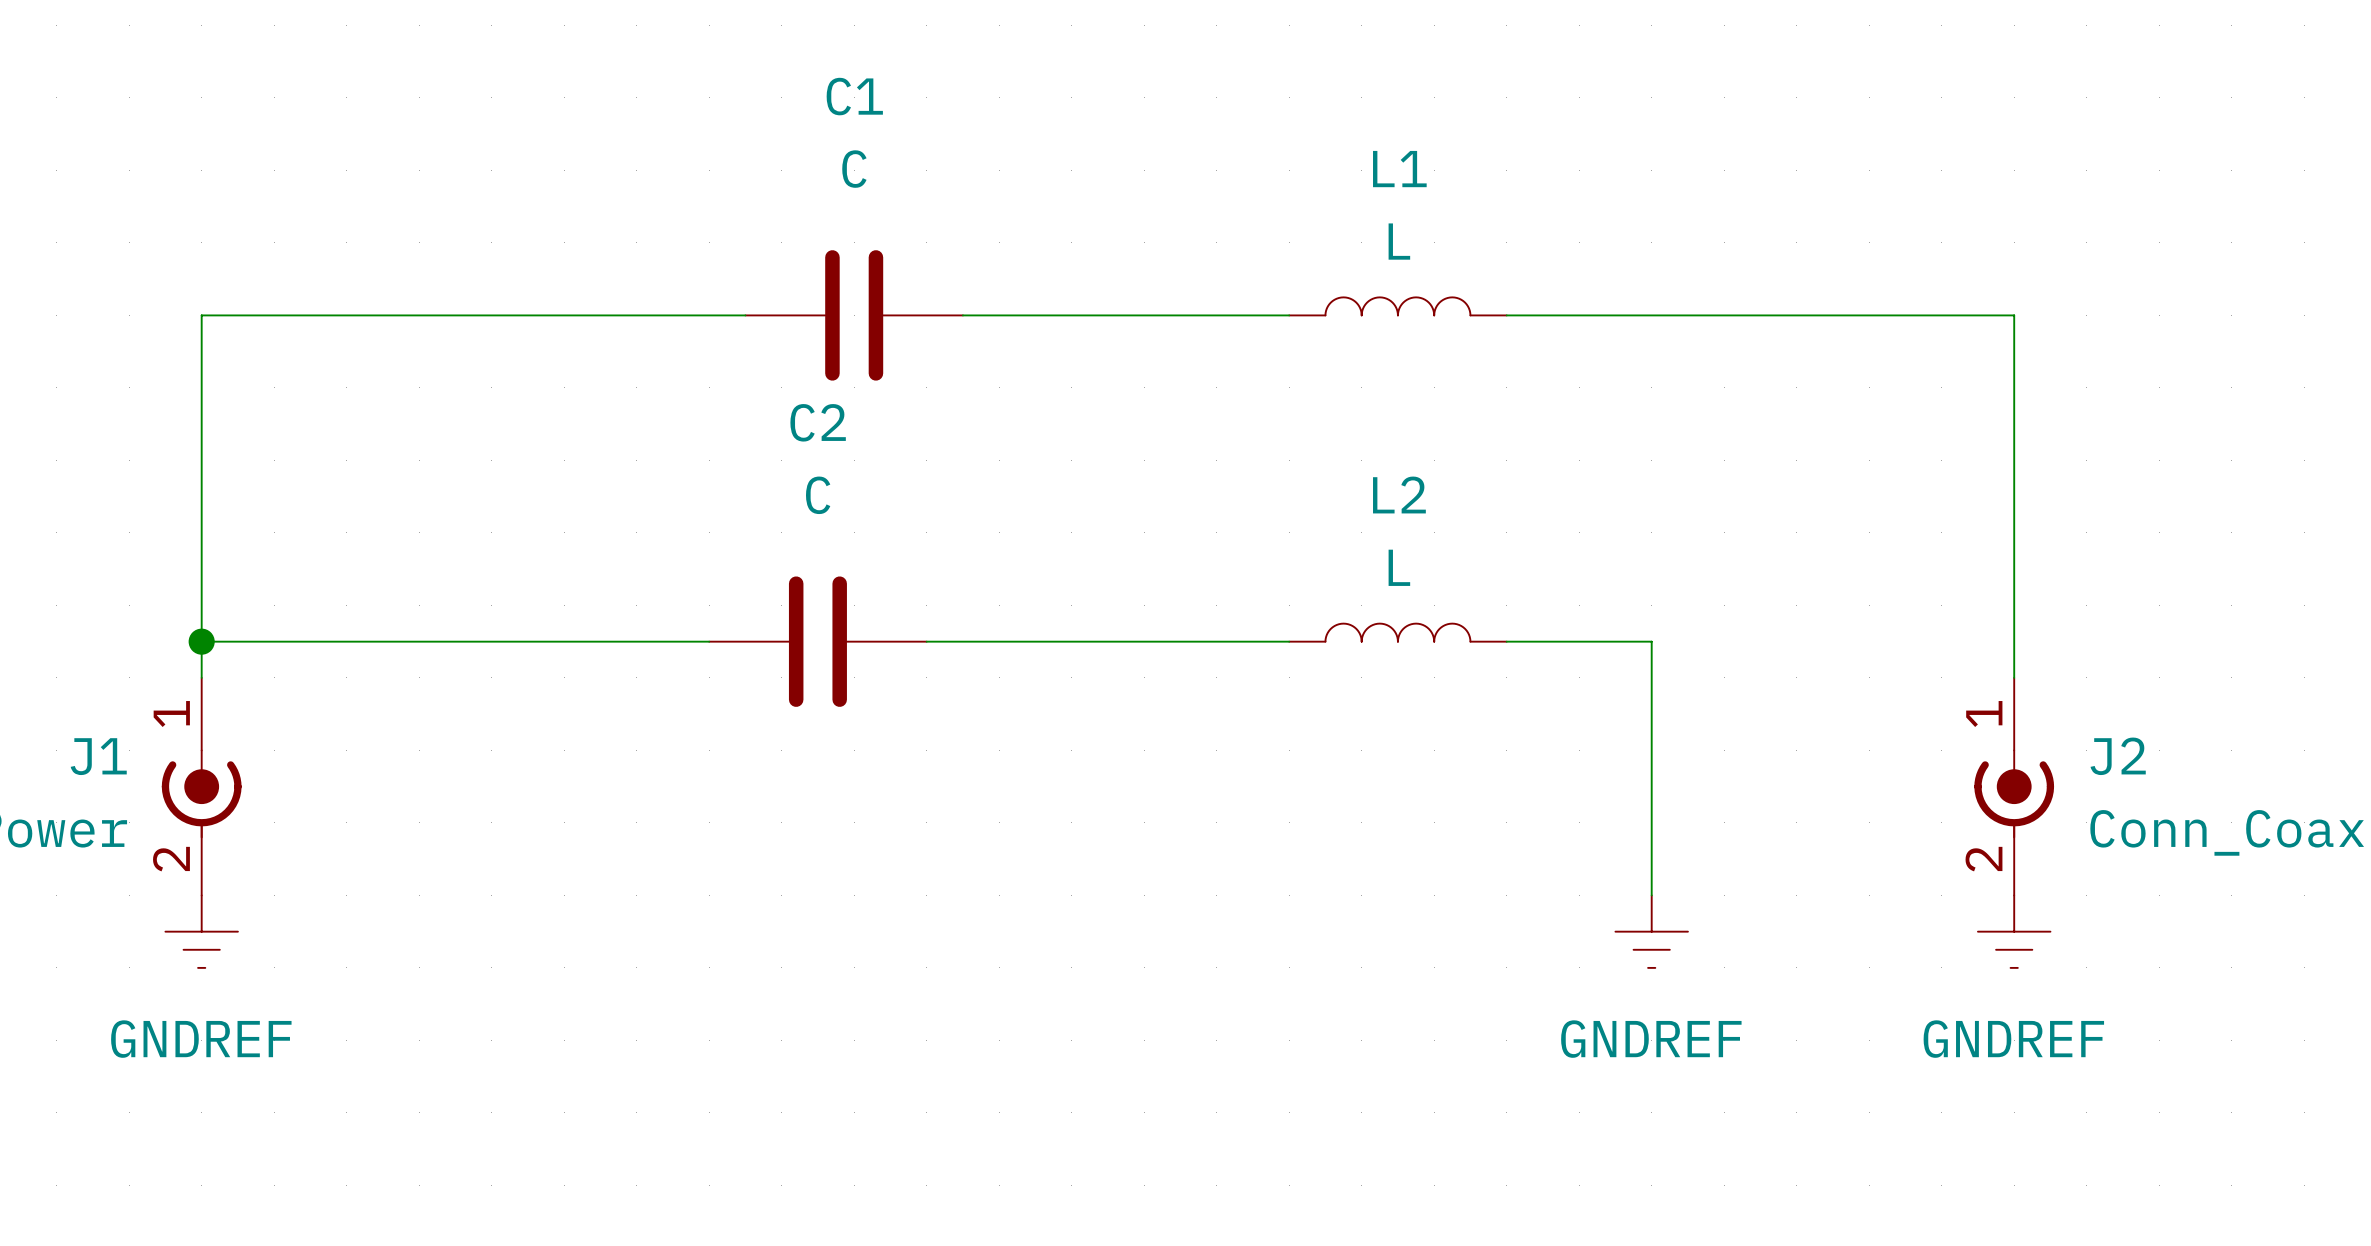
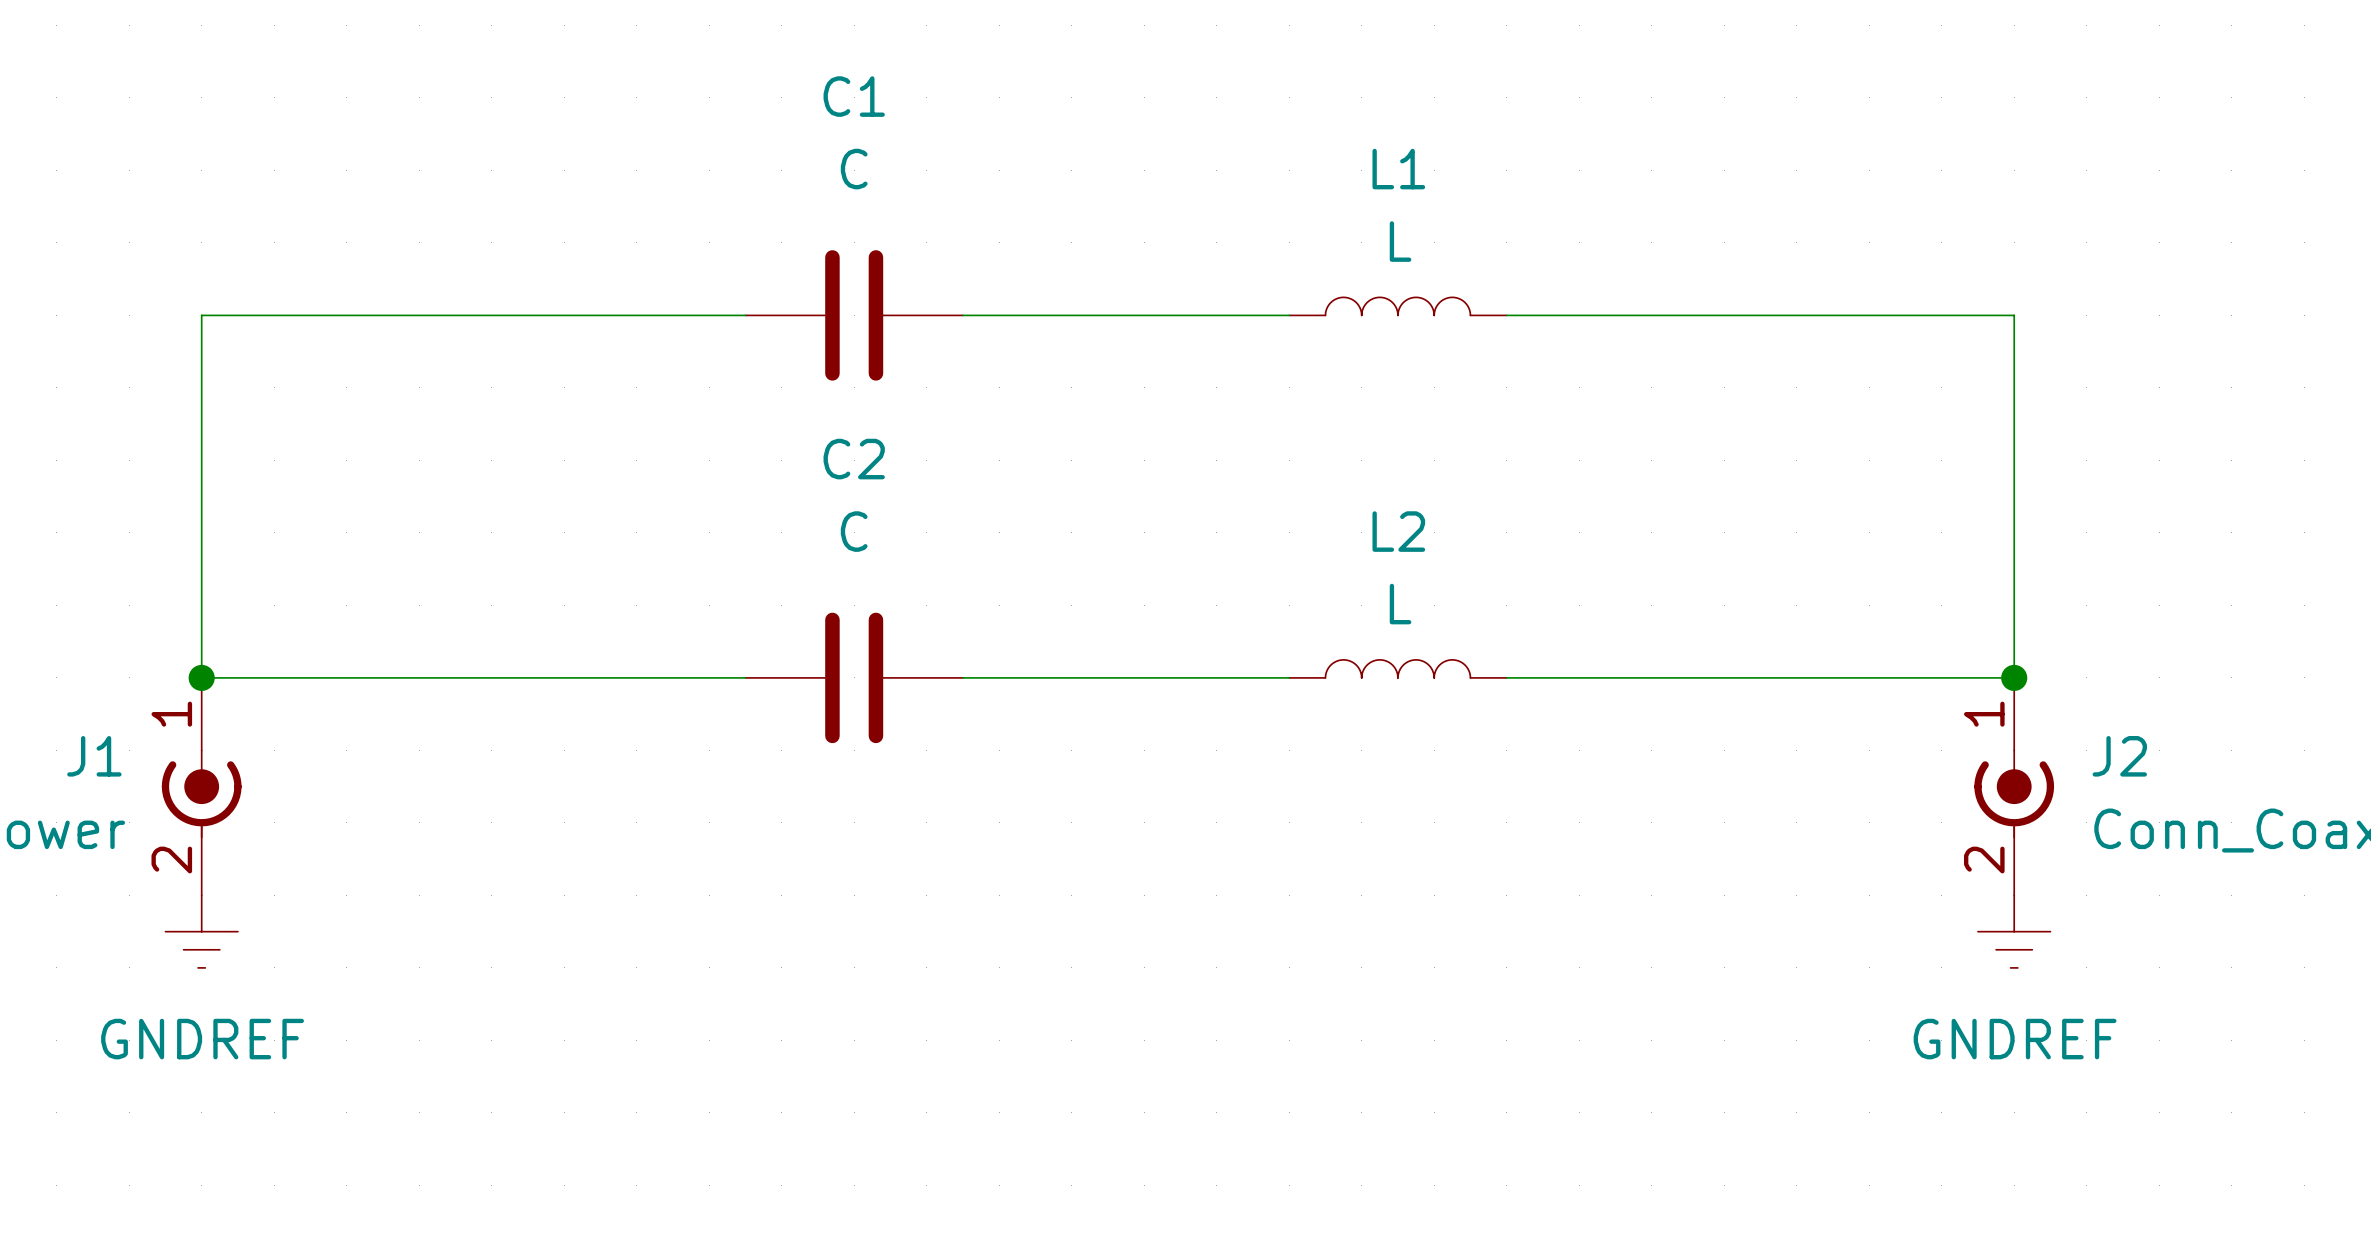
L2 position: (1397, 632) -> (1397, 668)
wire: (201, 641) (709, 641) -> none
junction position: (201, 641) -> (201, 677)
C2 position: (817, 641) -> (854, 677)
wire: (926, 641) (1289, 641) -> none
wire: (1506, 641) (1651, 641) (1651, 895) -> none
wire: none -> (201, 677) (745, 677)
wire: none -> (962, 677) (1289, 677)
wire: none -> (1506, 677) (2014, 677)
junction: none -> (2014, 677)
power symbol: GNDREF (1651, 931) -> none

